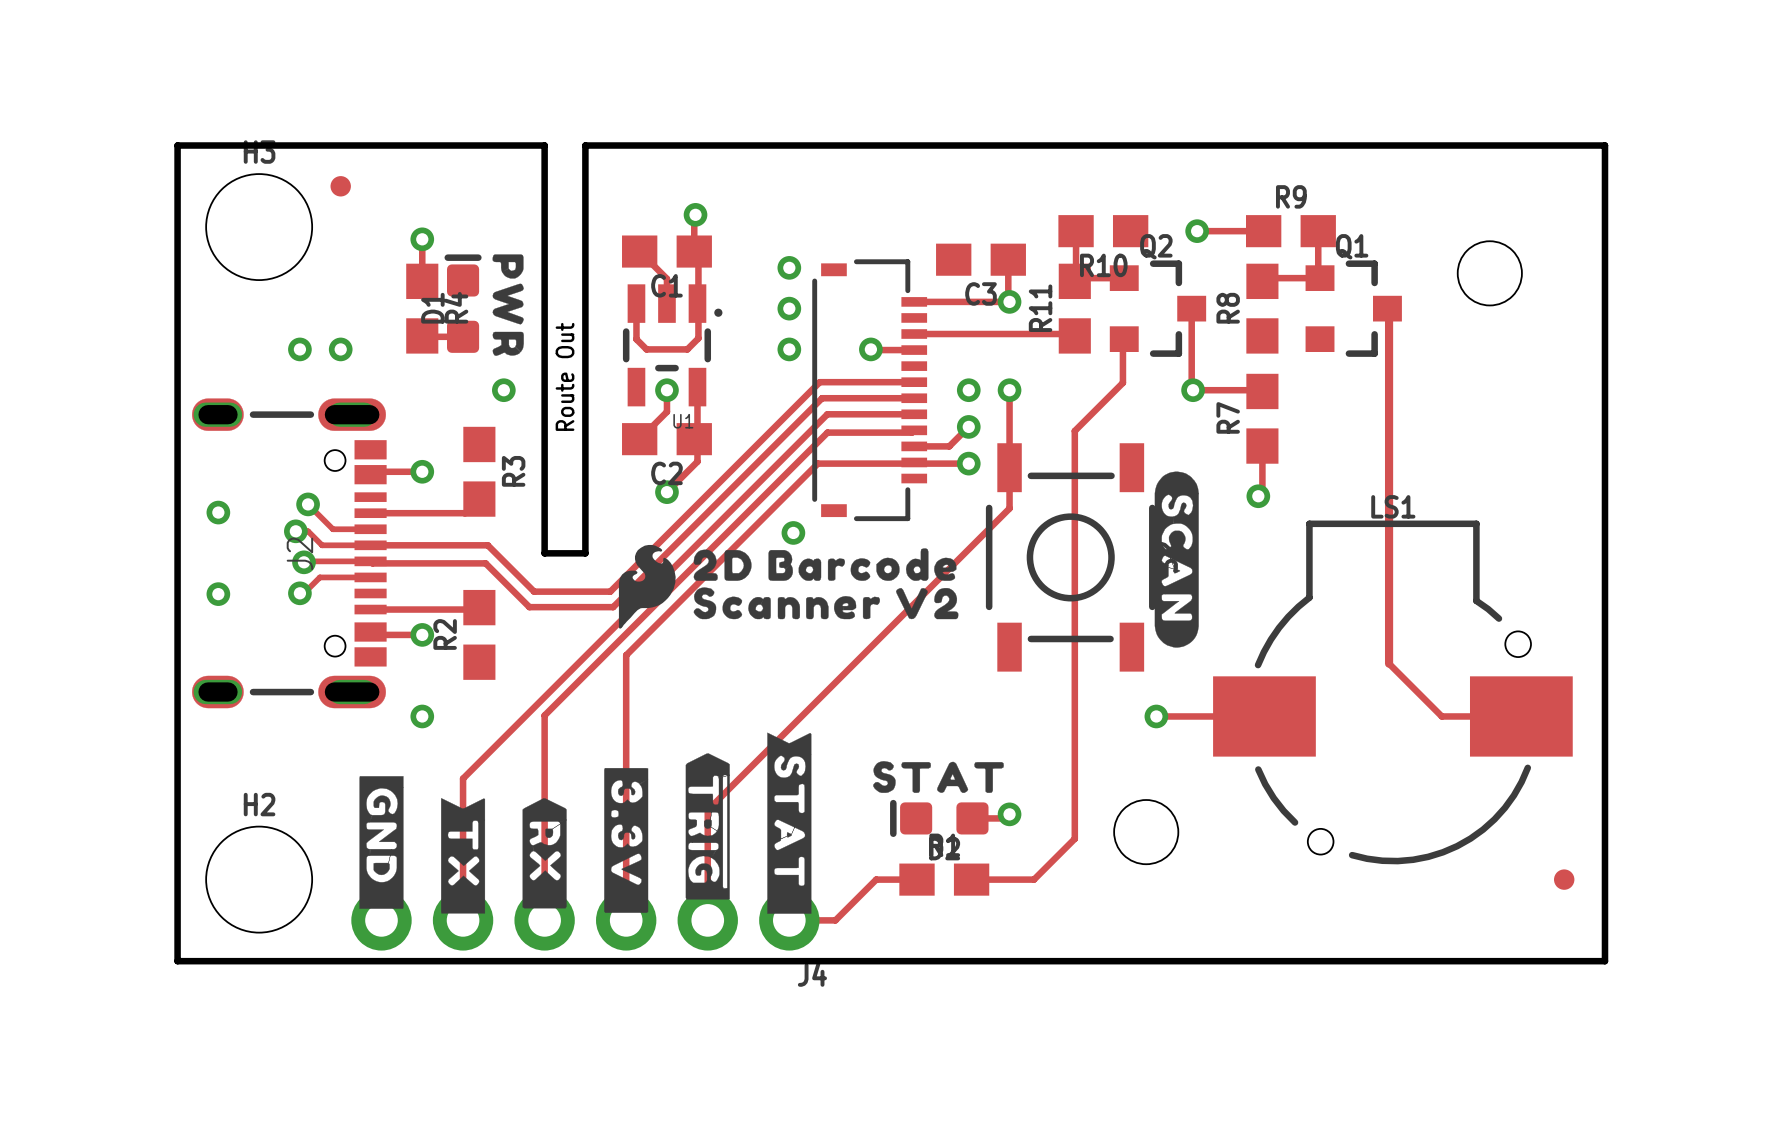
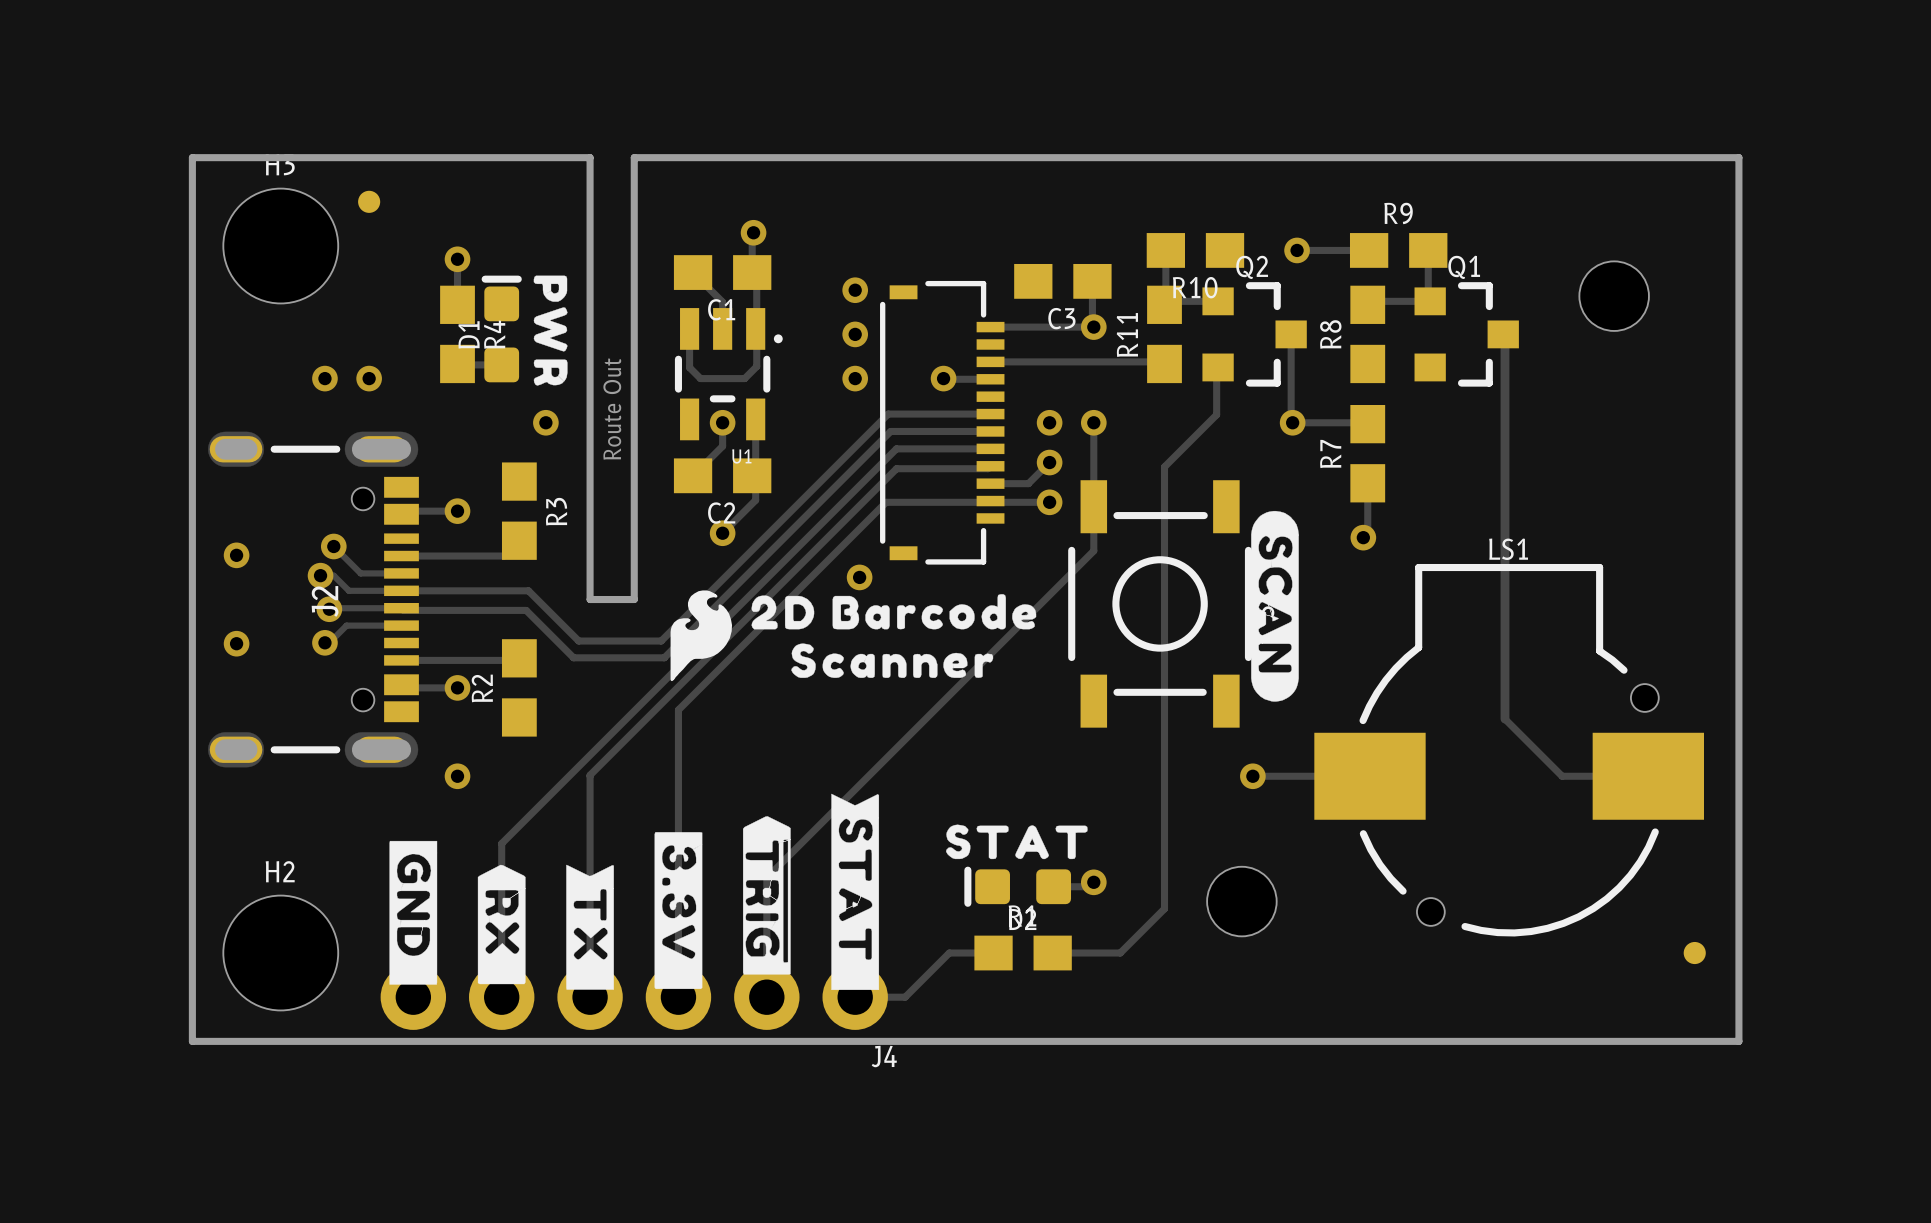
drawing shape: [693, 587, 959, 620] -> [791, 643, 994, 678]
drawing position: (544, 853) -> (501, 924)
drawing position: (463, 855) -> (590, 927)

